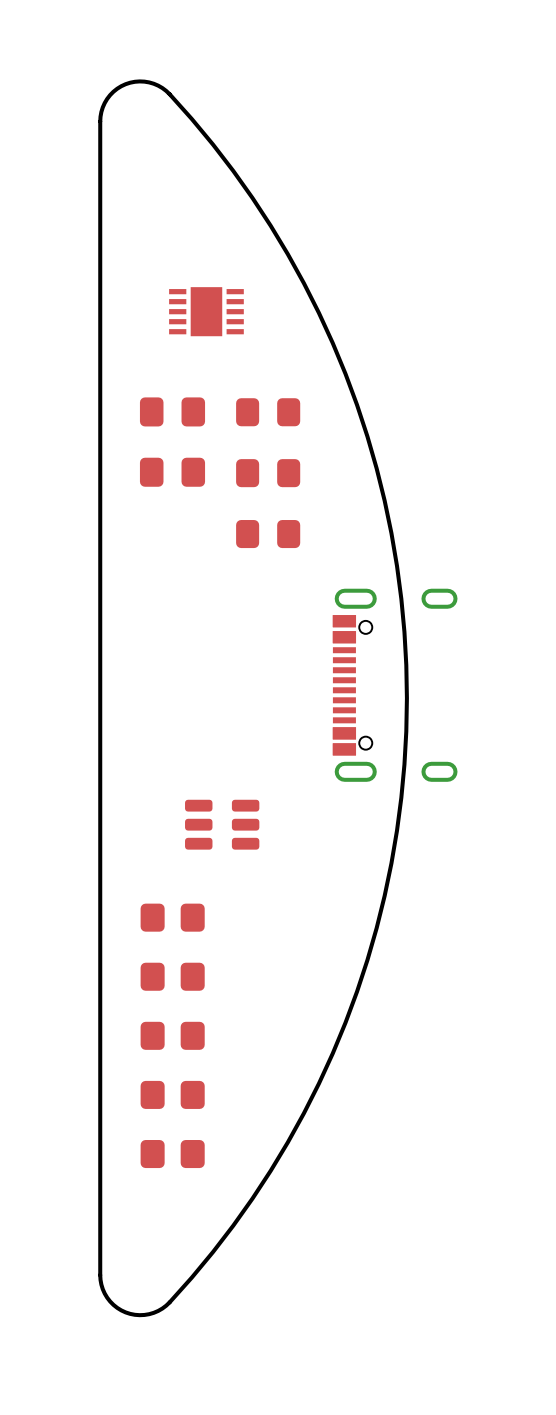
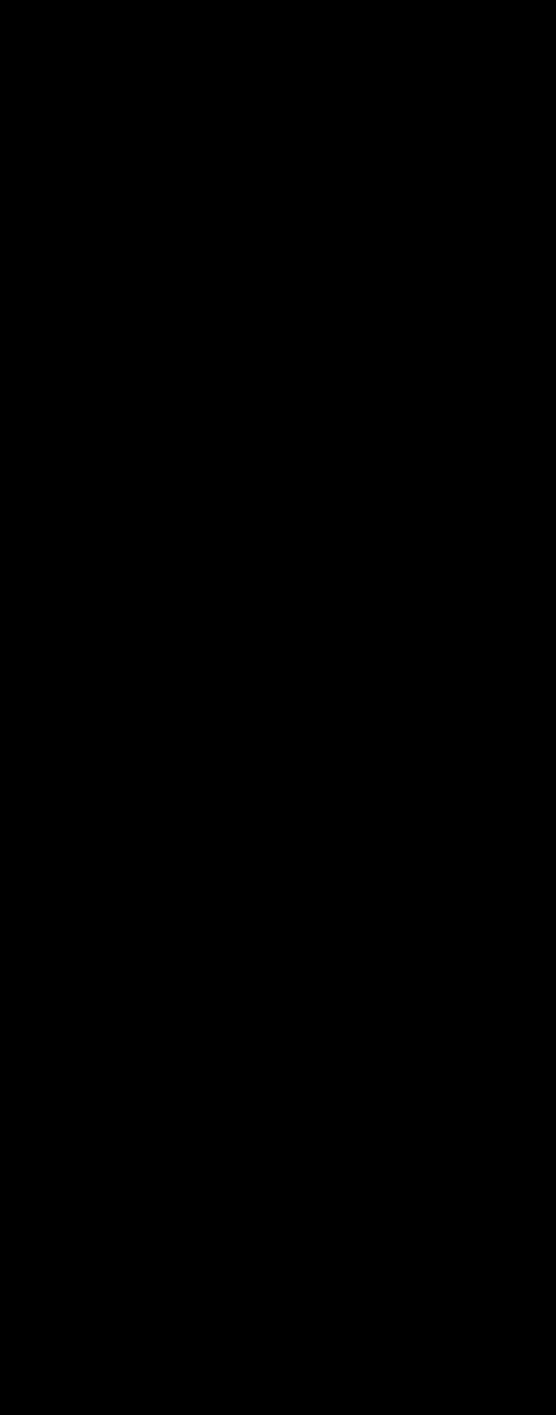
board edge: (169, 94) (213, 144) (270, 225) (318, 312) (357, 404) (384, 500) (397, 565) (404, 631) (406, 731) (401, 797) (384, 895) (367, 960) (332, 1053) (287, 1142) (233, 1225) (169, 1302) (158, 1310) (139, 1315) (125, 1312) (113, 1304) (102, 1289) (100, 1275) (100, 121) (101, 111) (107, 98) (117, 88) (125, 84) (134, 81) (149, 82) (162, 88) (169, 94) -> none
part: (206, 311) -> none
part: (172, 411) -> none
part: (268, 412) -> none
part: (172, 472) -> none
part: (268, 473) -> none
part: (268, 534) -> none
part: (395, 685) -> none
part: (222, 824) -> none
part: (172, 917) -> none
part: (172, 976) -> none
part: (172, 1035) -> none
part: (172, 1094) -> none
part: (172, 1154) -> none

